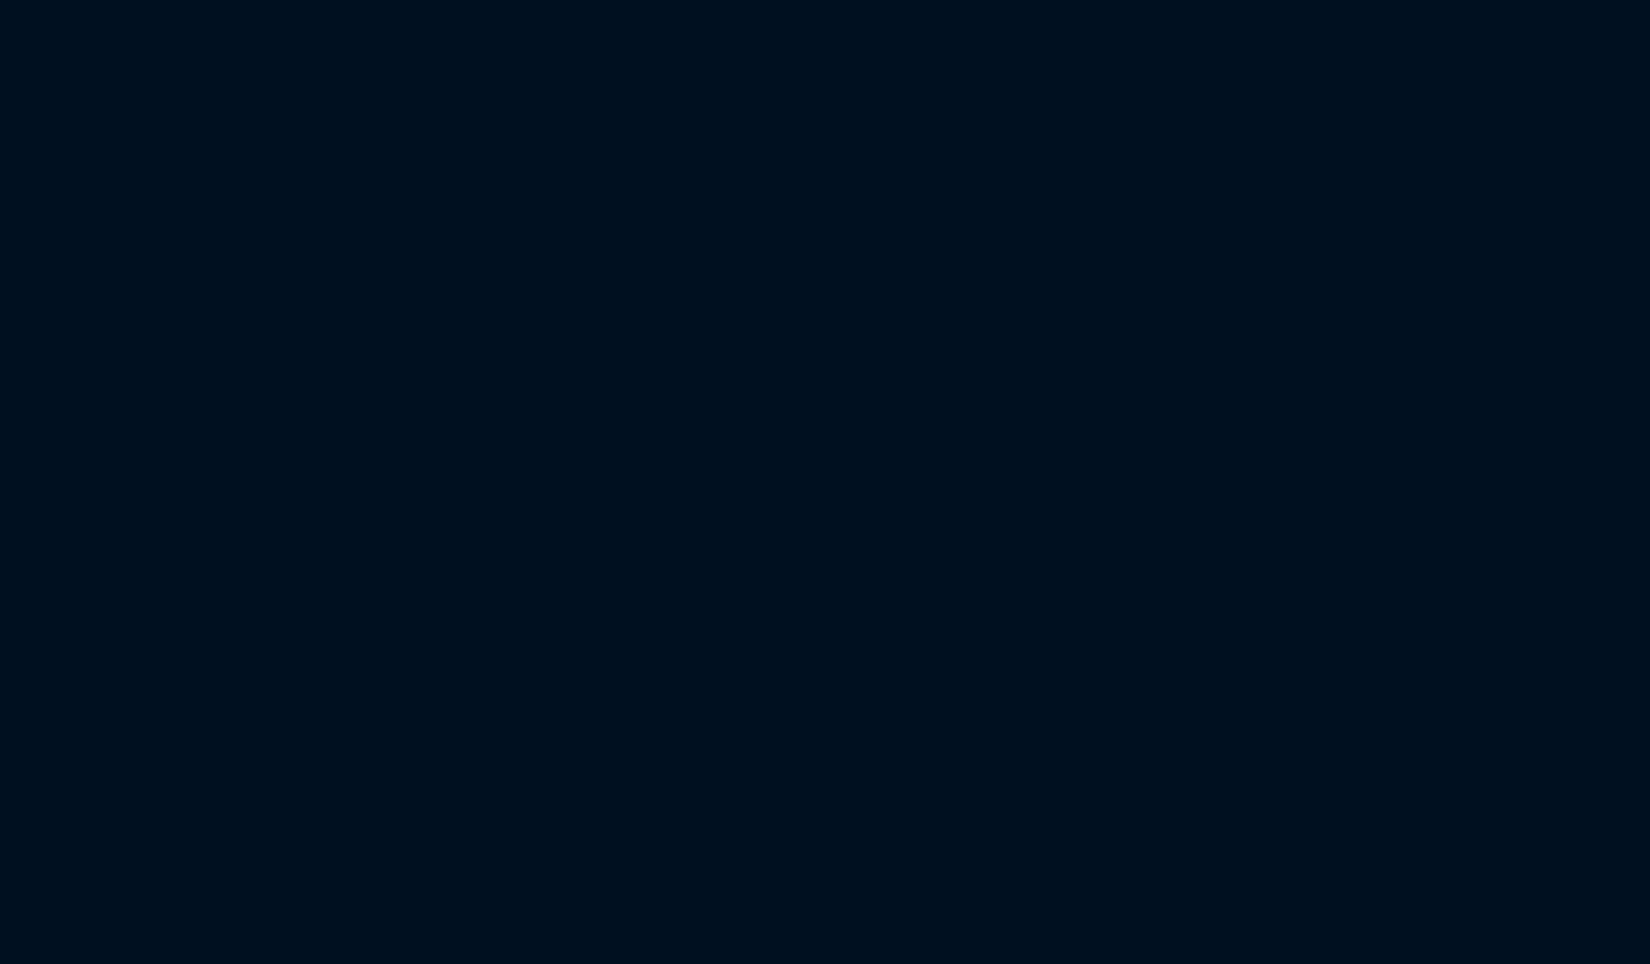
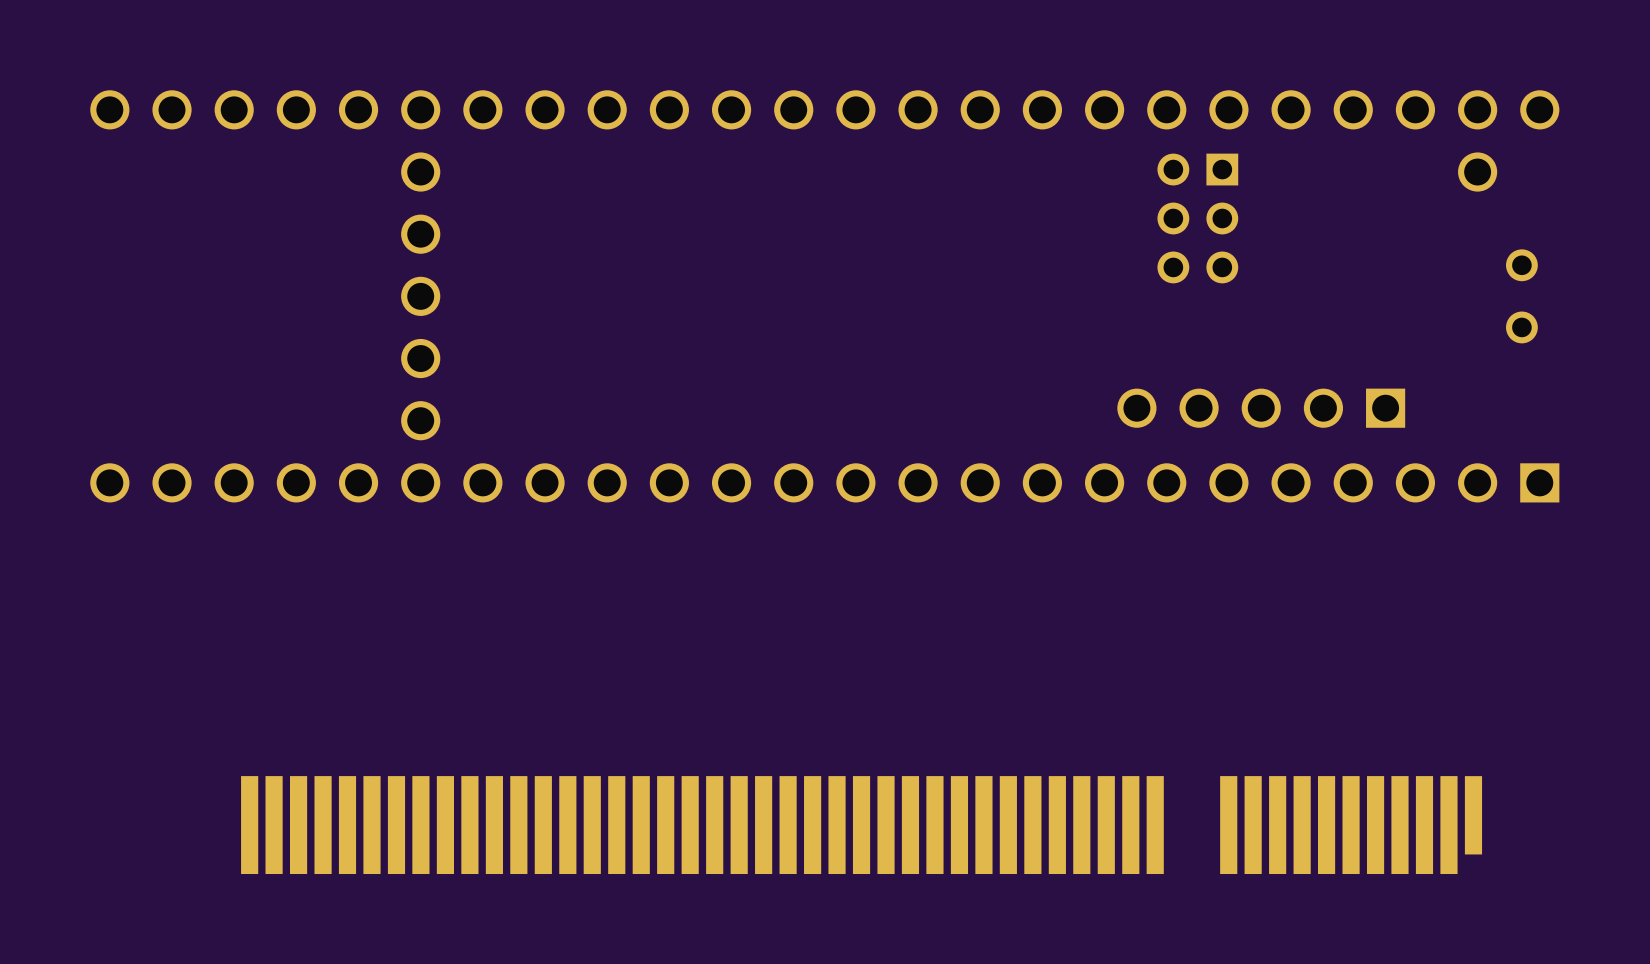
part: none -> (824, 296)
part: none -> (861, 825)

